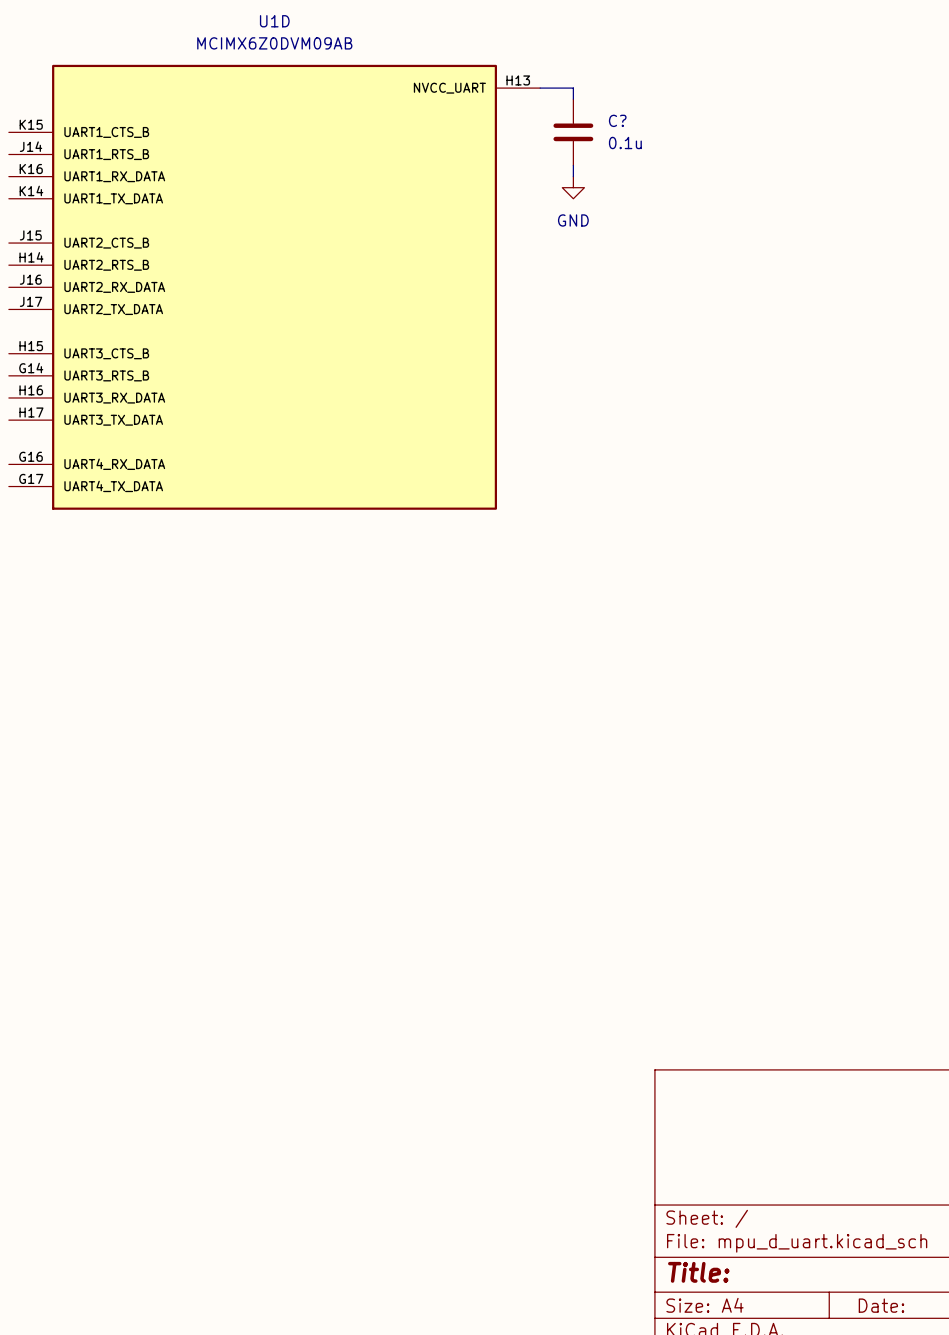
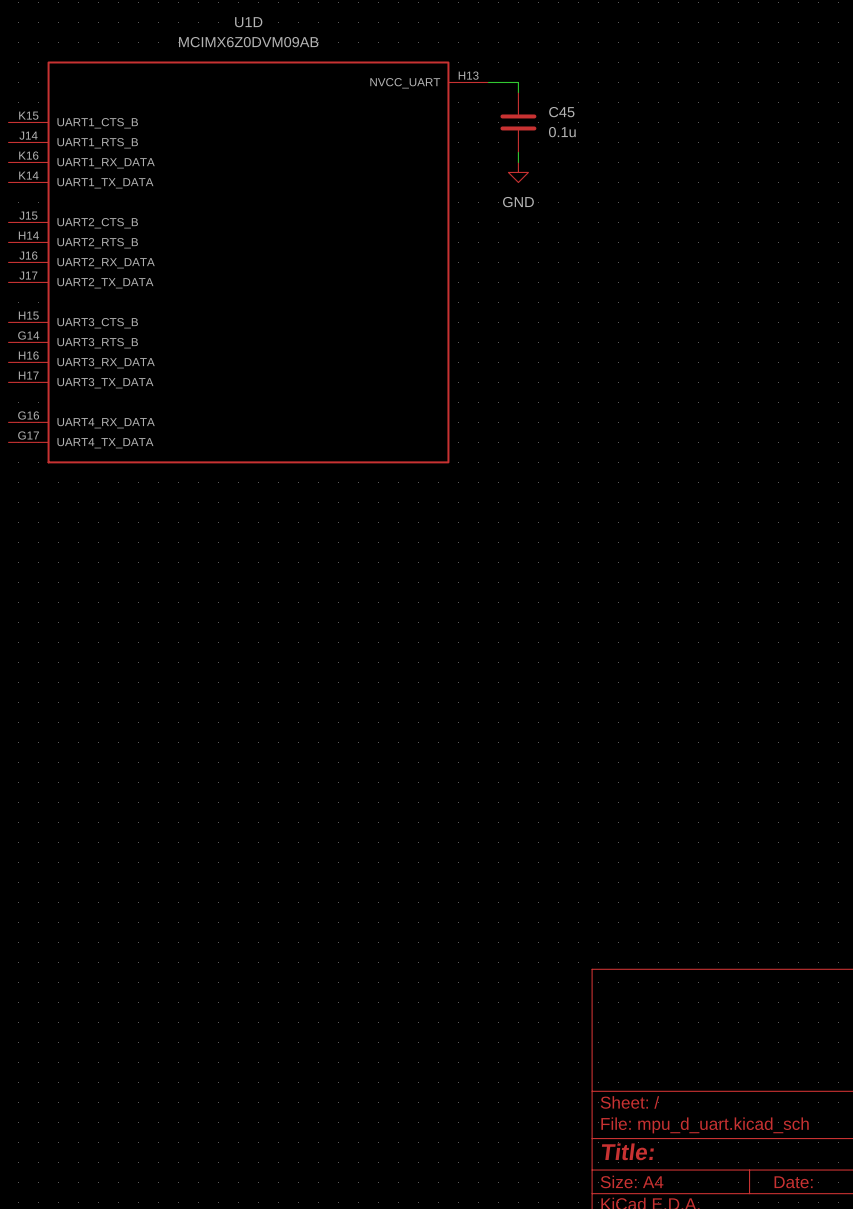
C? name: C? (617, 120) -> C45 (561, 112)

